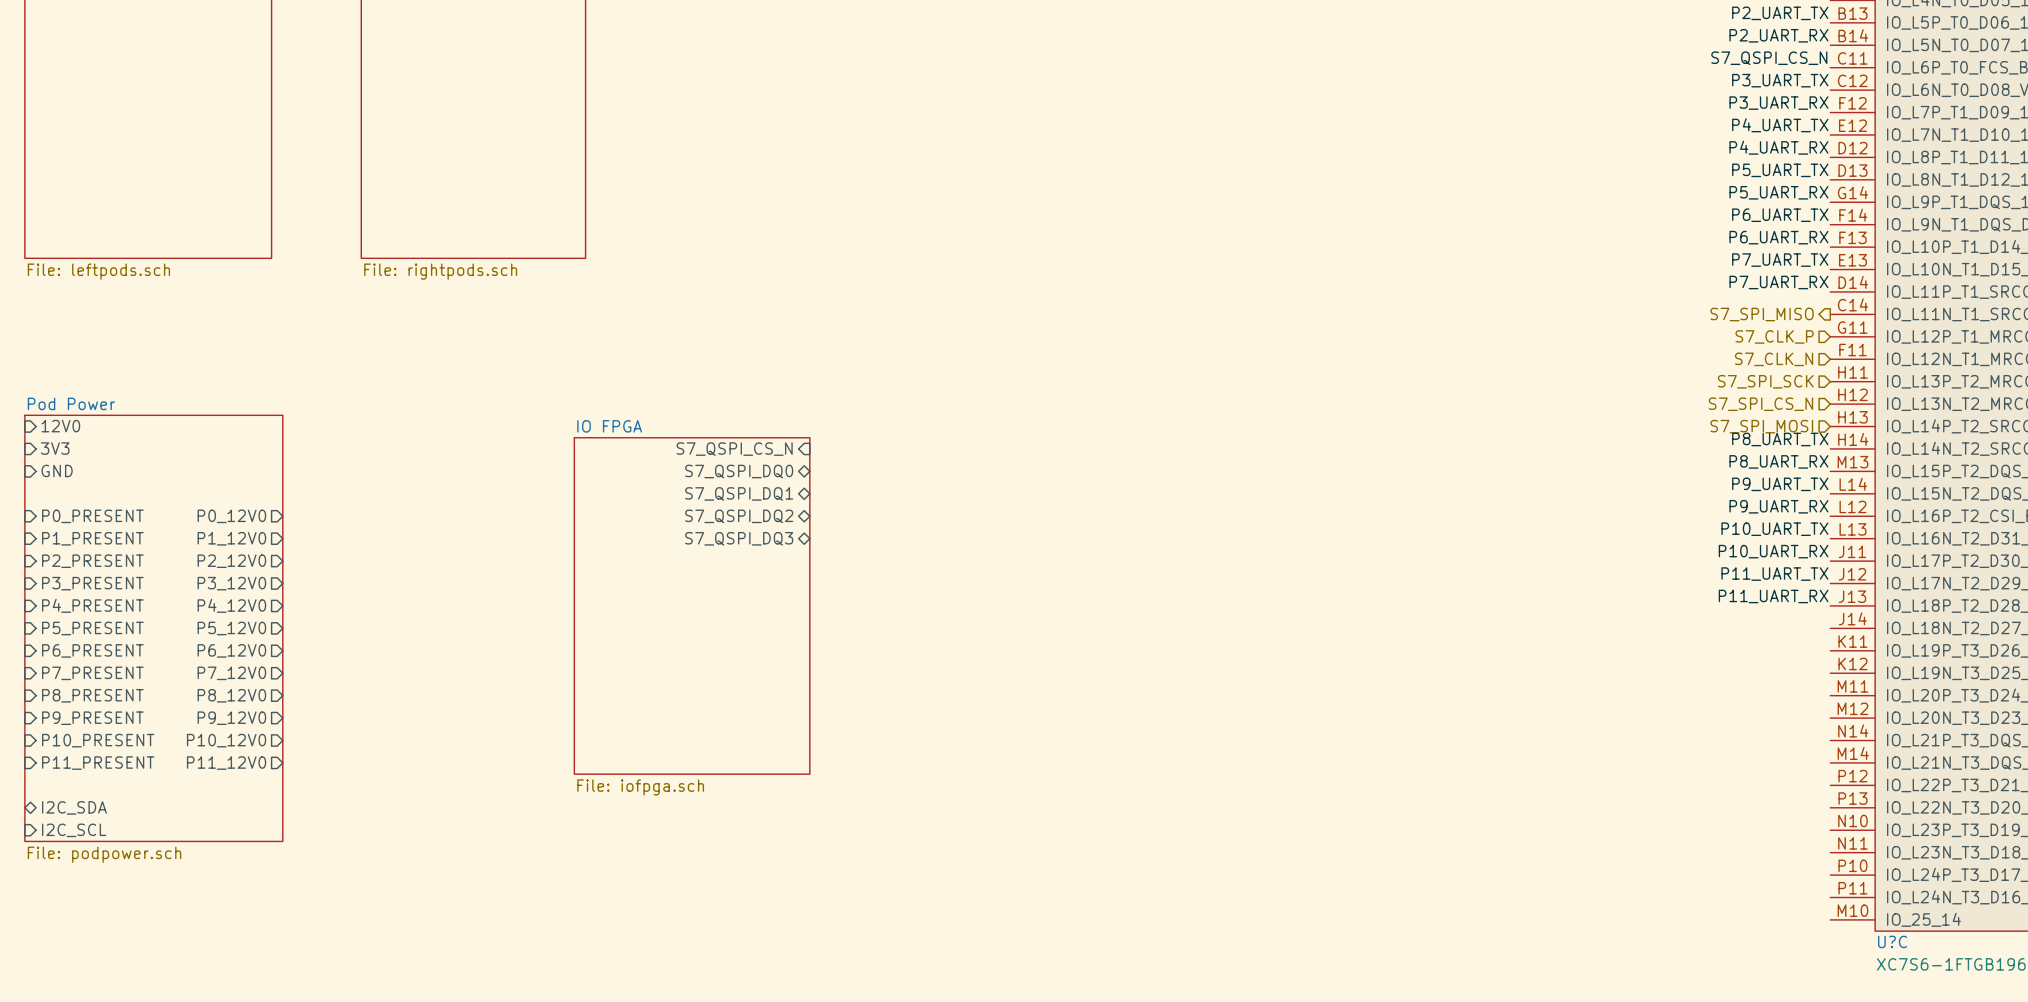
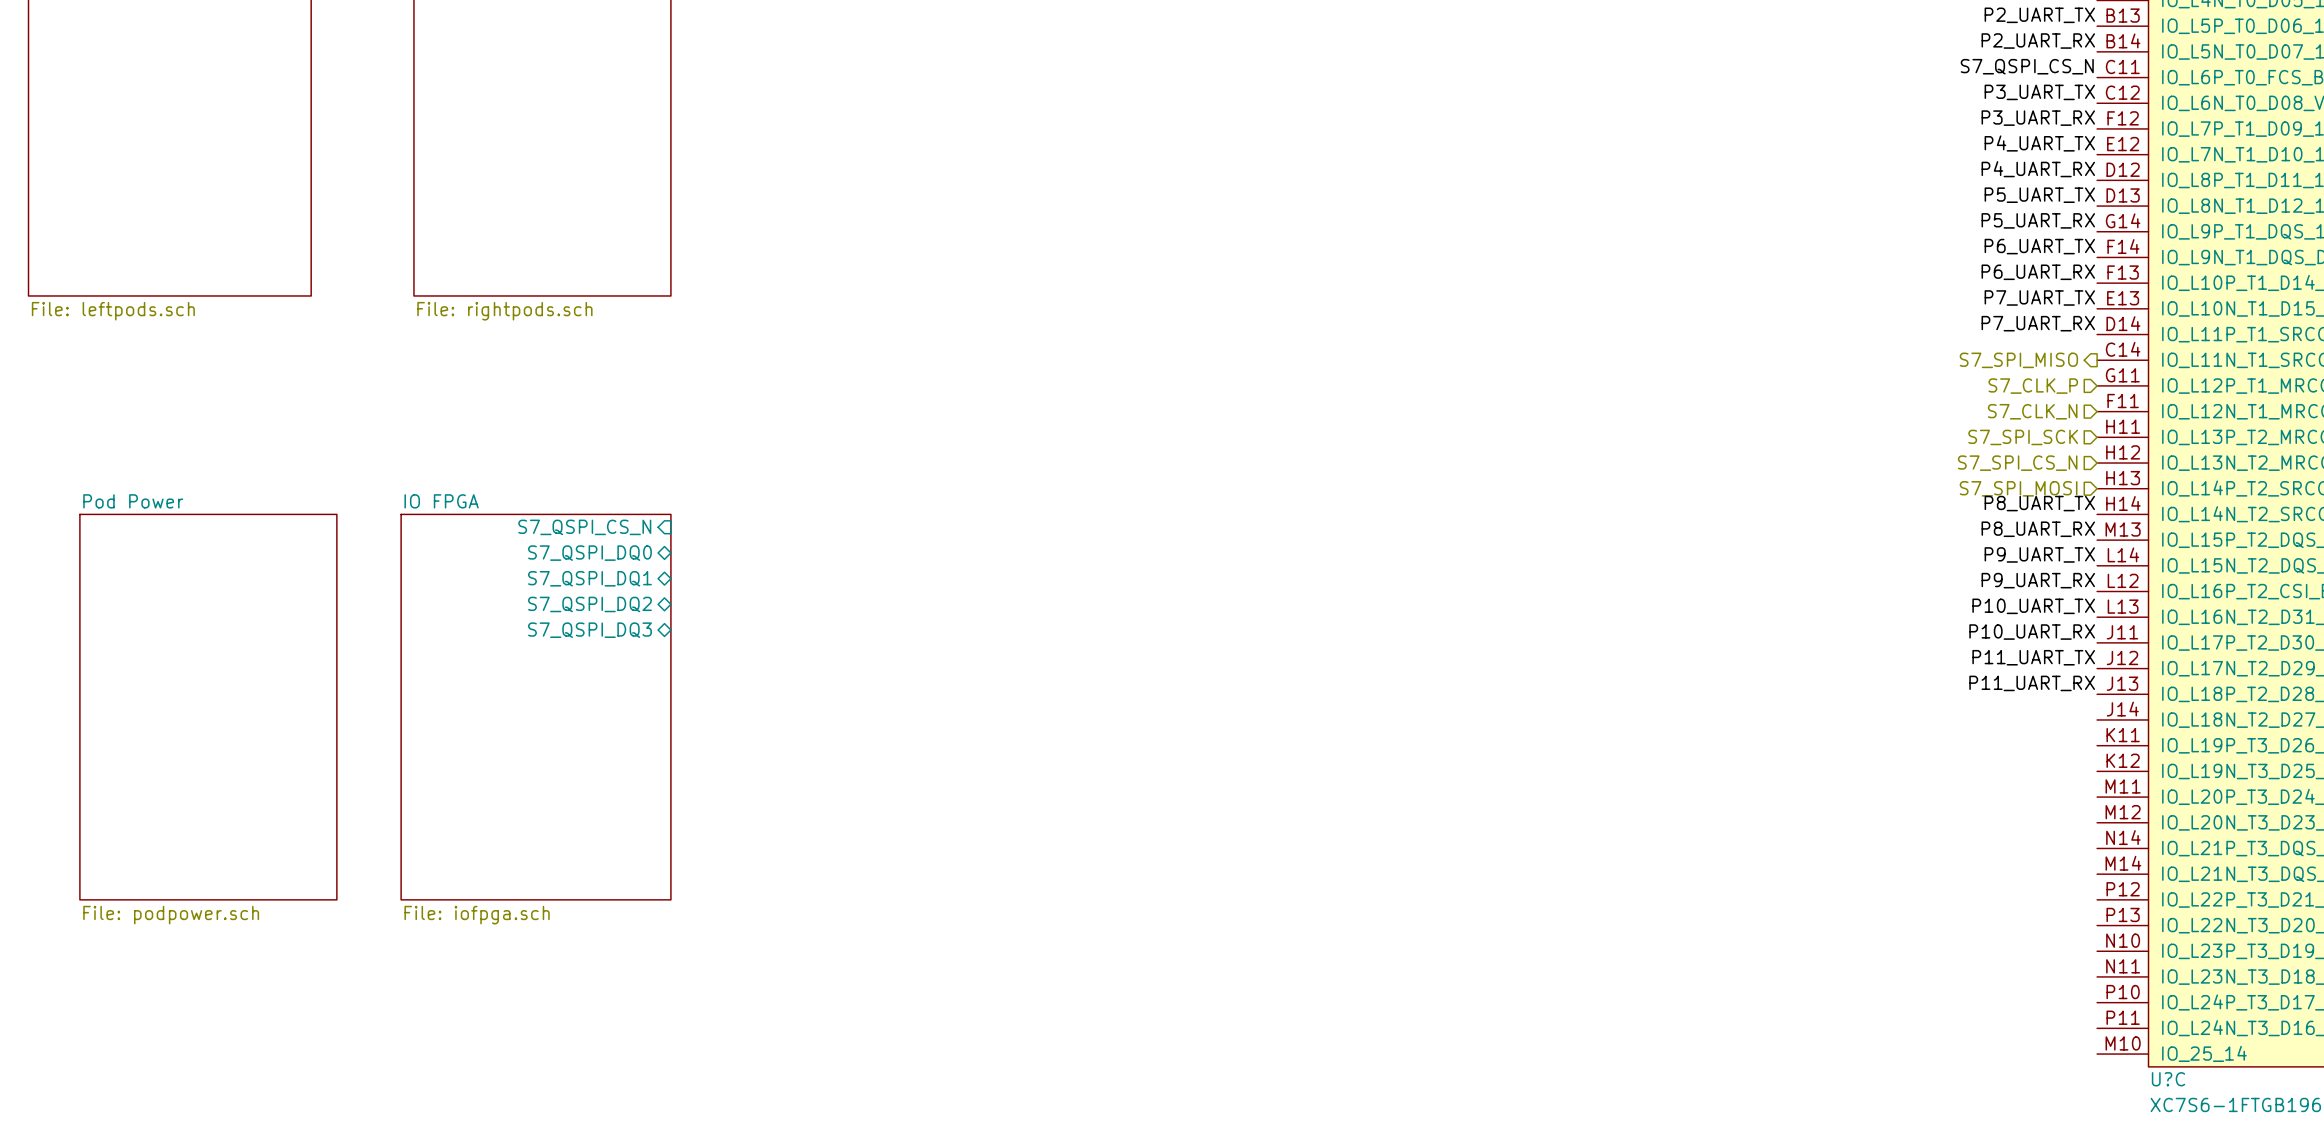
sheet pin: 12V0 (60, 426) -> none
sheet pin: 3V3 (55, 448) -> none
sheet pin: S7_QSPI_CS_N (734, 449) -> none
sheet pin: none -> S7_QSPI_CS_N (584, 527)
sheet pin: GND (57, 470) -> none
sheet pin: S7_QSPI_DQ0 (739, 471) -> none
sheet pin: none -> S7_QSPI_DQ0 (589, 553)
sheet pin: S7_QSPI_DQ1 (739, 493) -> none
sheet pin: none -> S7_QSPI_DQ1 (589, 578)
sheet pin: P0_PRESENT (92, 516) -> none
sheet pin: P0_12V0 (231, 516) -> none
sheet pin: S7_QSPI_DQ2 (739, 516) -> none
sheet pin: none -> S7_QSPI_DQ2 (589, 604)
sheet pin: P1_PRESENT (92, 538) -> none
sheet pin: P1_12V0 (231, 538) -> none
sheet pin: S7_QSPI_DQ3 (739, 538) -> none
sheet pin: none -> S7_QSPI_DQ3 (589, 630)
sheet pin: P2_PRESENT (92, 561) -> none
sheet pin: P2_12V0 (231, 561) -> none
sheet pin: P3_PRESENT (92, 583) -> none
sheet pin: P3_12V0 (231, 583) -> none
sheet pin: P4_PRESENT (92, 605) -> none
sheet pin: P4_12V0 (231, 605) -> none
sheet IO FPGA: File: iofpga.sch (692, 605) -> none
sheet Pod Power: none -> File: podpower.sch (208, 707)
sheet IO FPGA: none -> File: iofpga.sch (536, 707)
sheet pin: P5_PRESENT (92, 628) -> none
sheet Pod Power: File: podpower.sch (153, 628) -> none
sheet pin: P5_12V0 (231, 628) -> none
sheet pin: P6_PRESENT (92, 650) -> none
sheet pin: P6_12V0 (231, 650) -> none
sheet pin: P7_PRESENT (92, 673) -> none
sheet pin: P7_12V0 (231, 673) -> none
sheet pin: P8_PRESENT (92, 695) -> none
sheet pin: P8_12V0 (231, 695) -> none
sheet pin: P9_PRESENT (92, 718) -> none
sheet pin: P9_12V0 (231, 718) -> none
sheet pin: P10_PRESENT (98, 740) -> none
sheet pin: P10_12V0 (226, 740) -> none
sheet pin: P11_PRESENT (98, 763) -> none
sheet pin: P11_12V0 (226, 763) -> none
sheet pin: I2C_SDA (74, 807) -> none
sheet pin: I2C_SCL (74, 830) -> none

